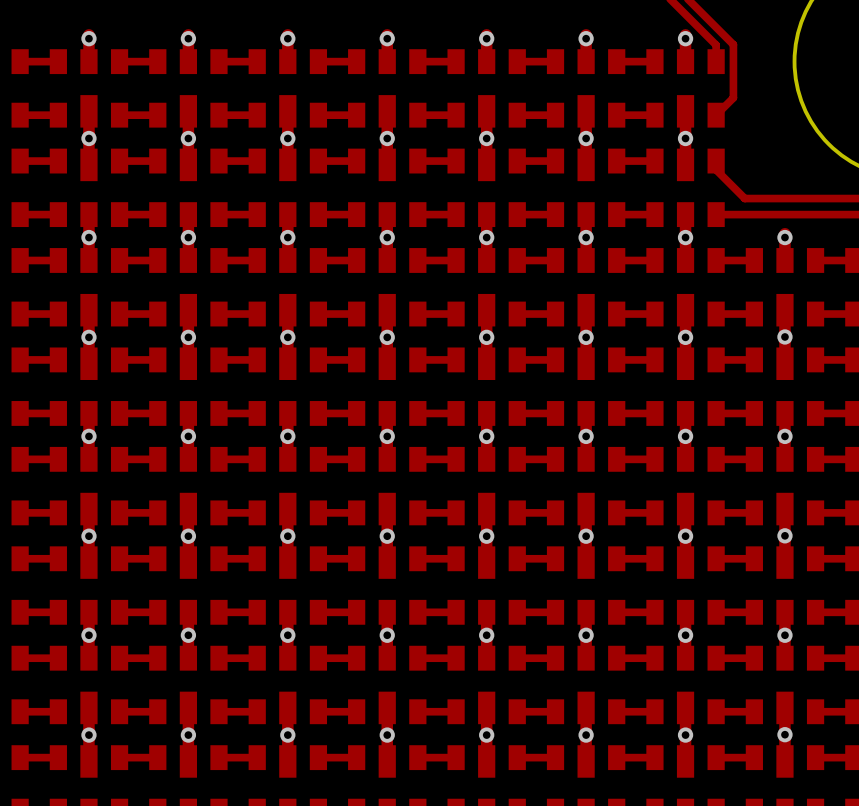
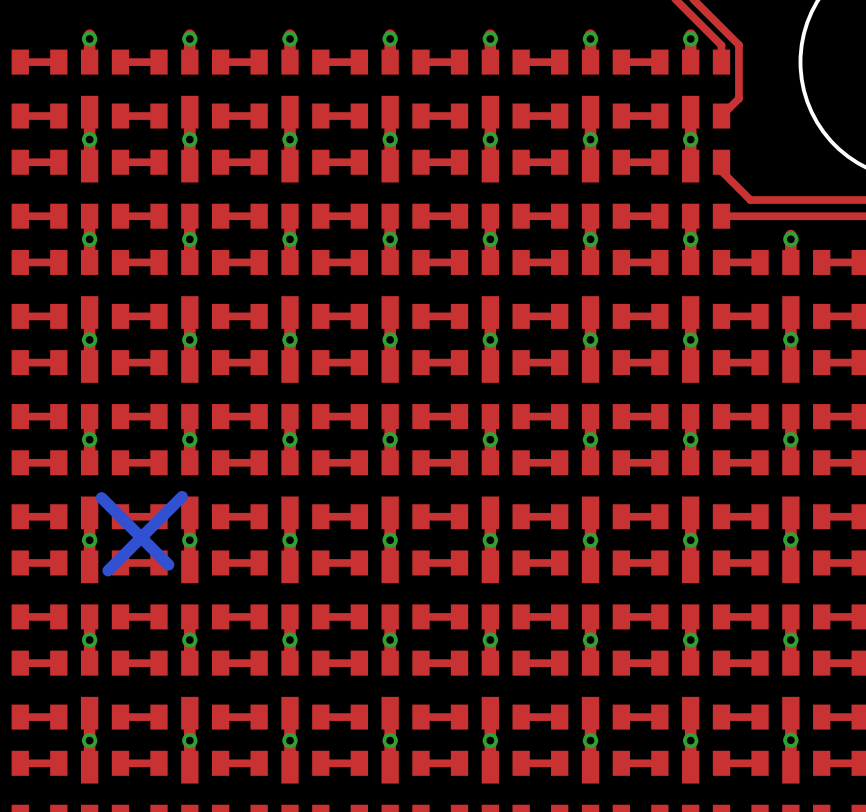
bottom track: none -> (182, 496) (108, 570)
bottom track: none -> (101, 497) (168, 564)

